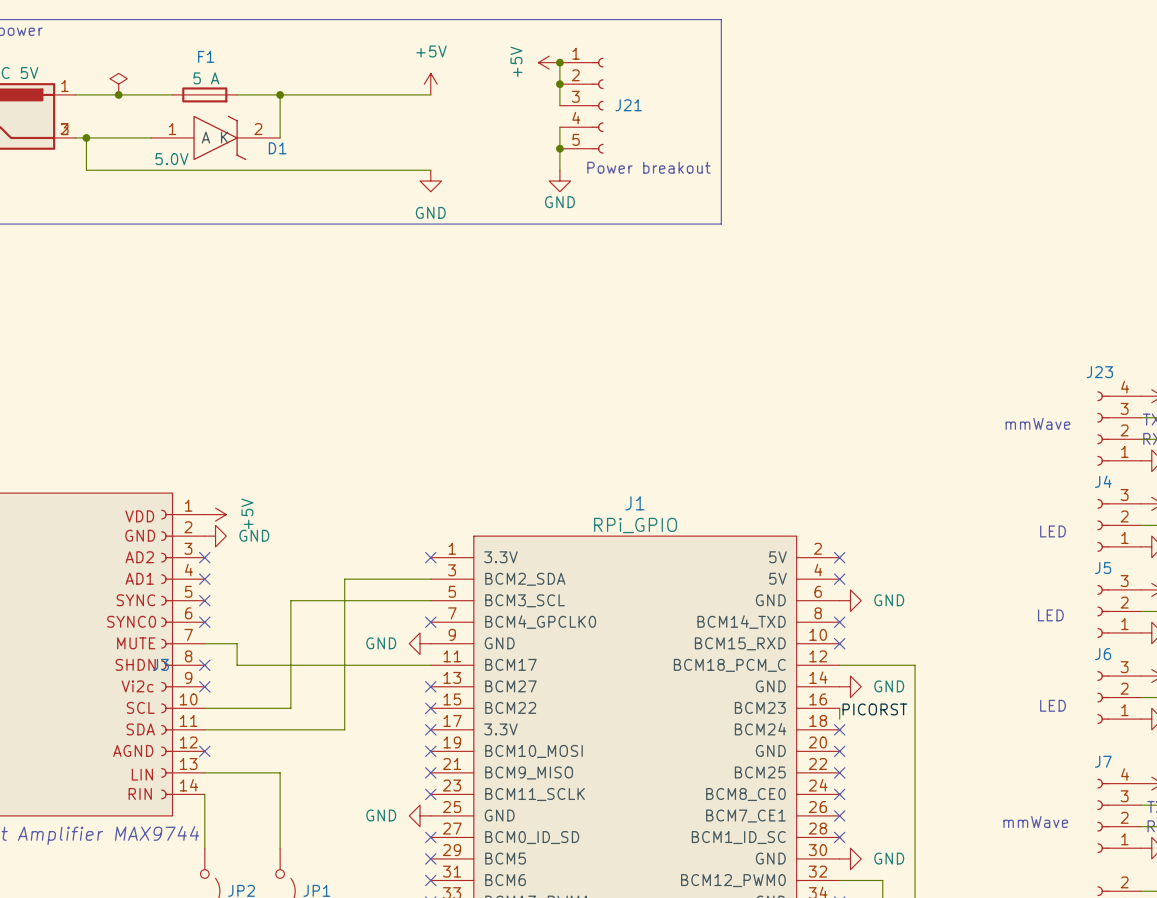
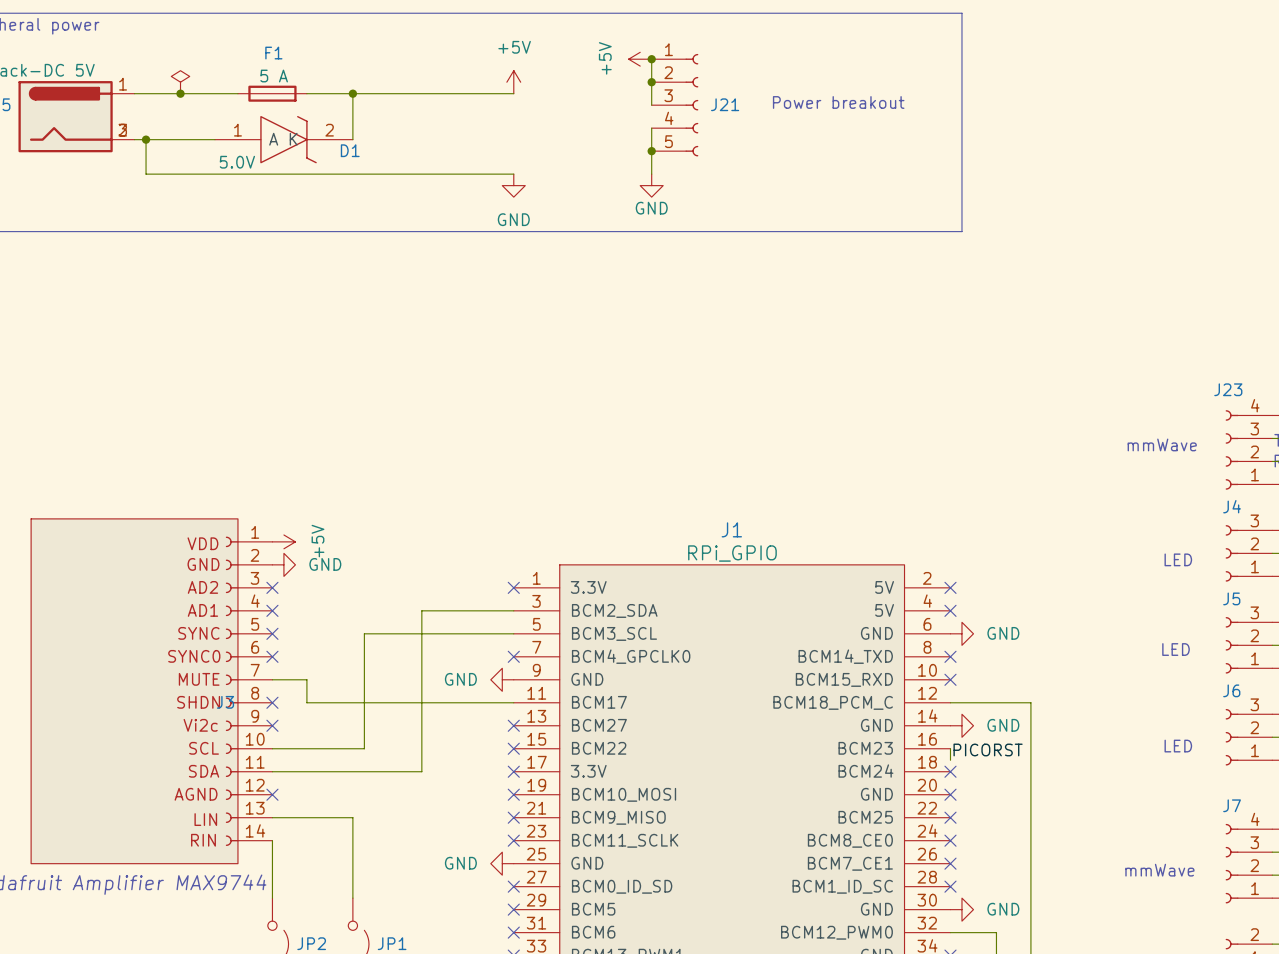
line: (721, 19) (721, 224) -> (824, 13) (961, 13) (961, 231) (824, 231)
text position: Power breakout (648, 167) -> Power breakout (838, 102)

